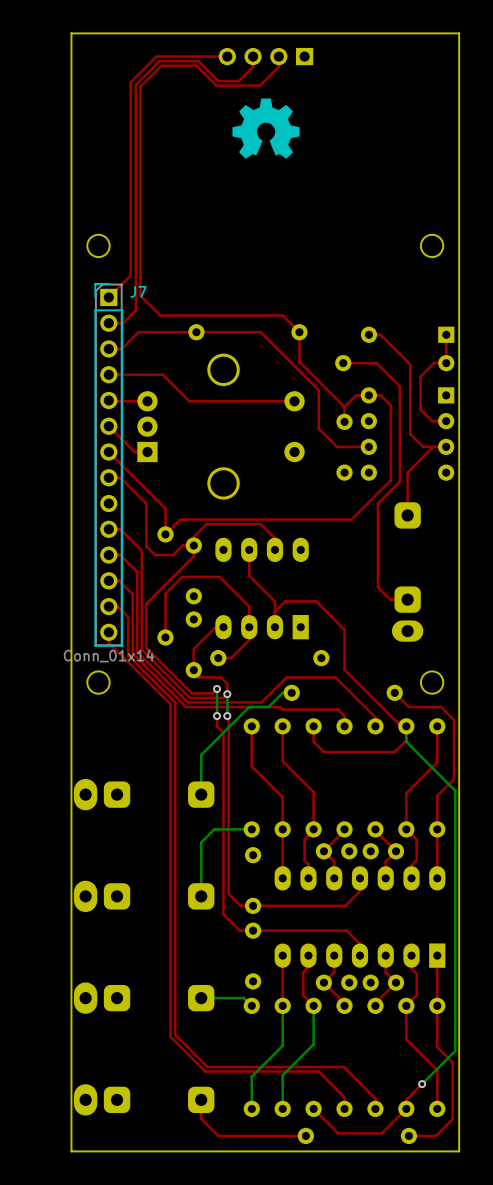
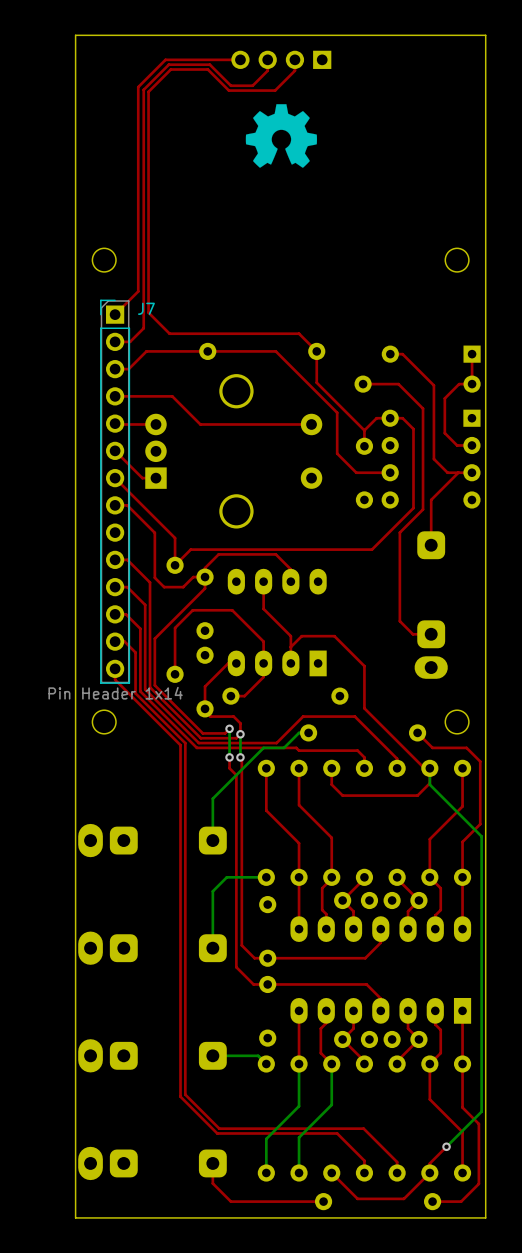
J7 value: Conn_01x14 (109, 655) -> Pin Header 1x14 (115, 693)

